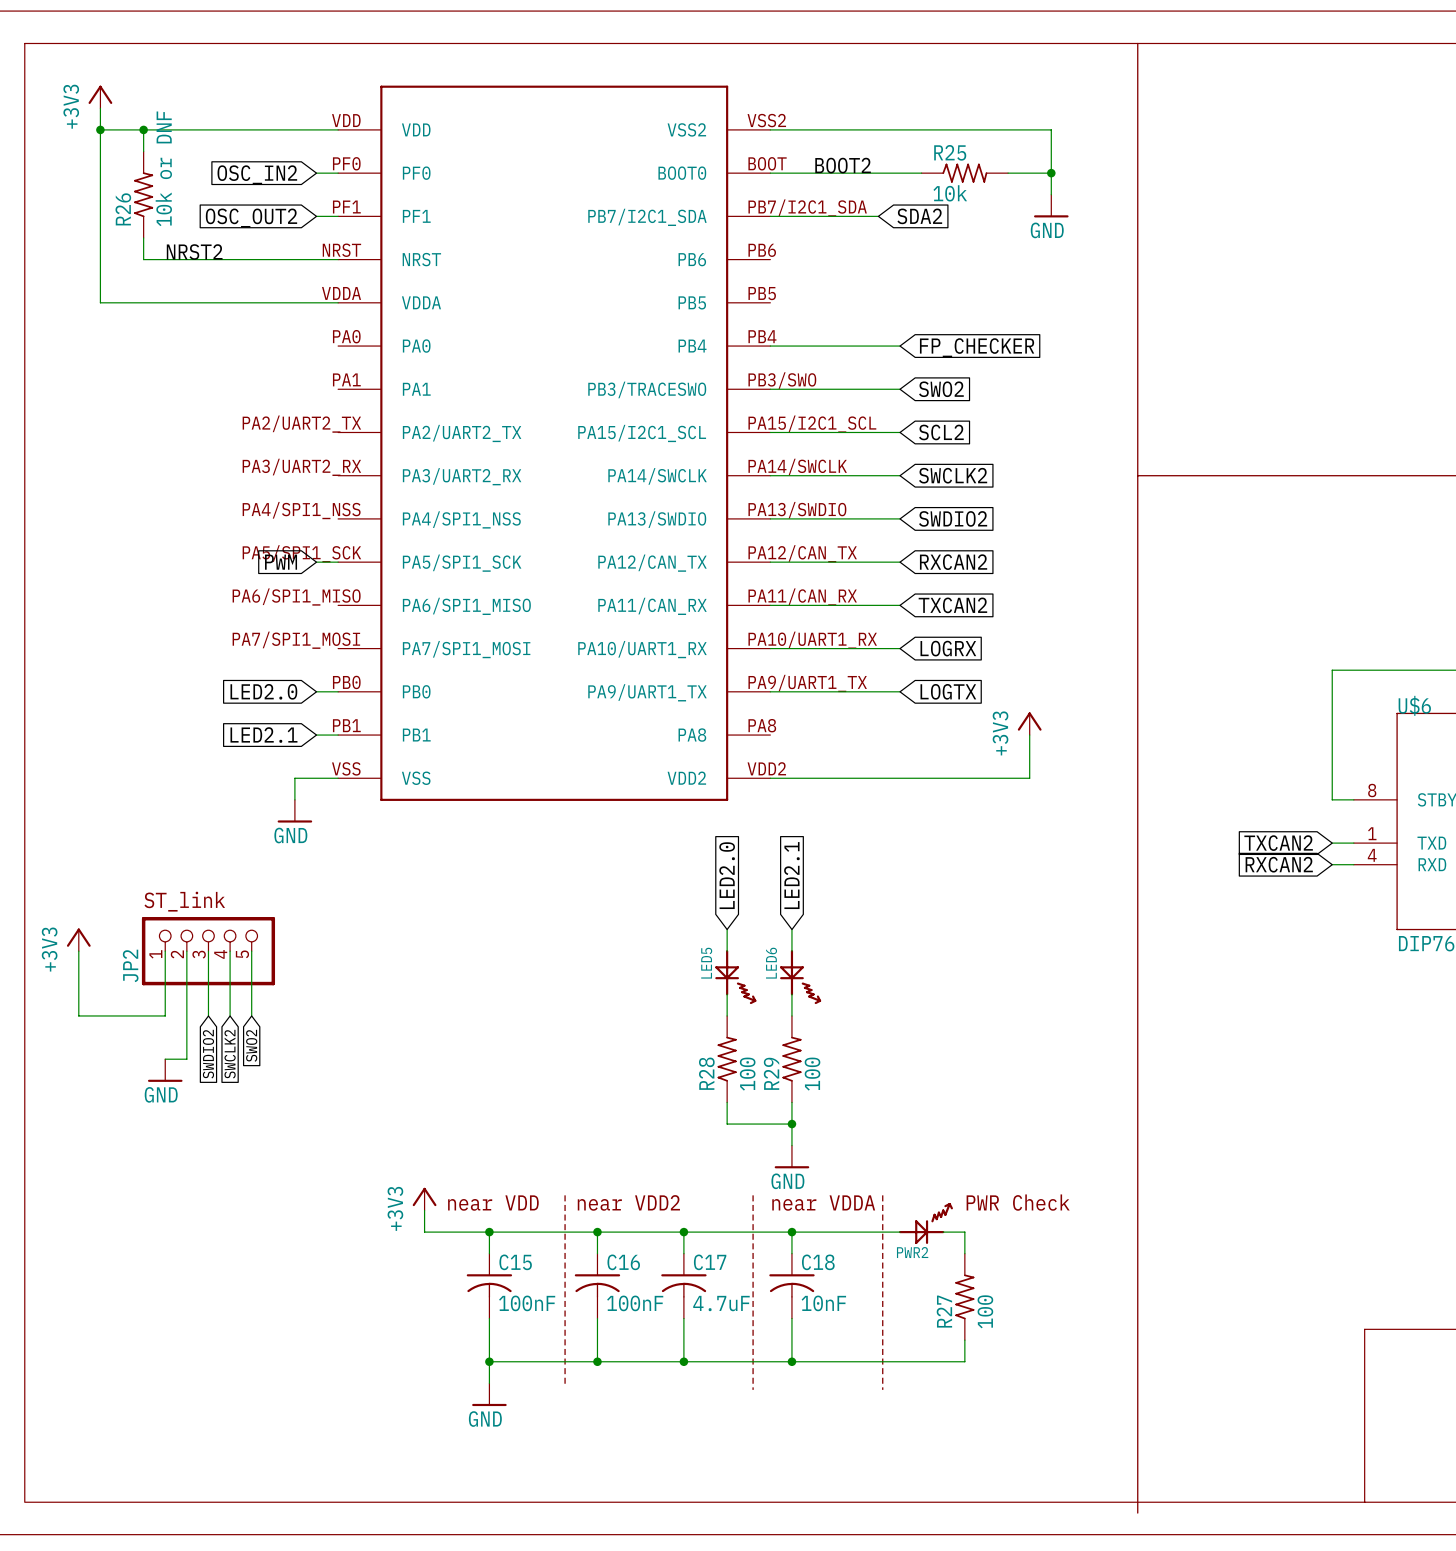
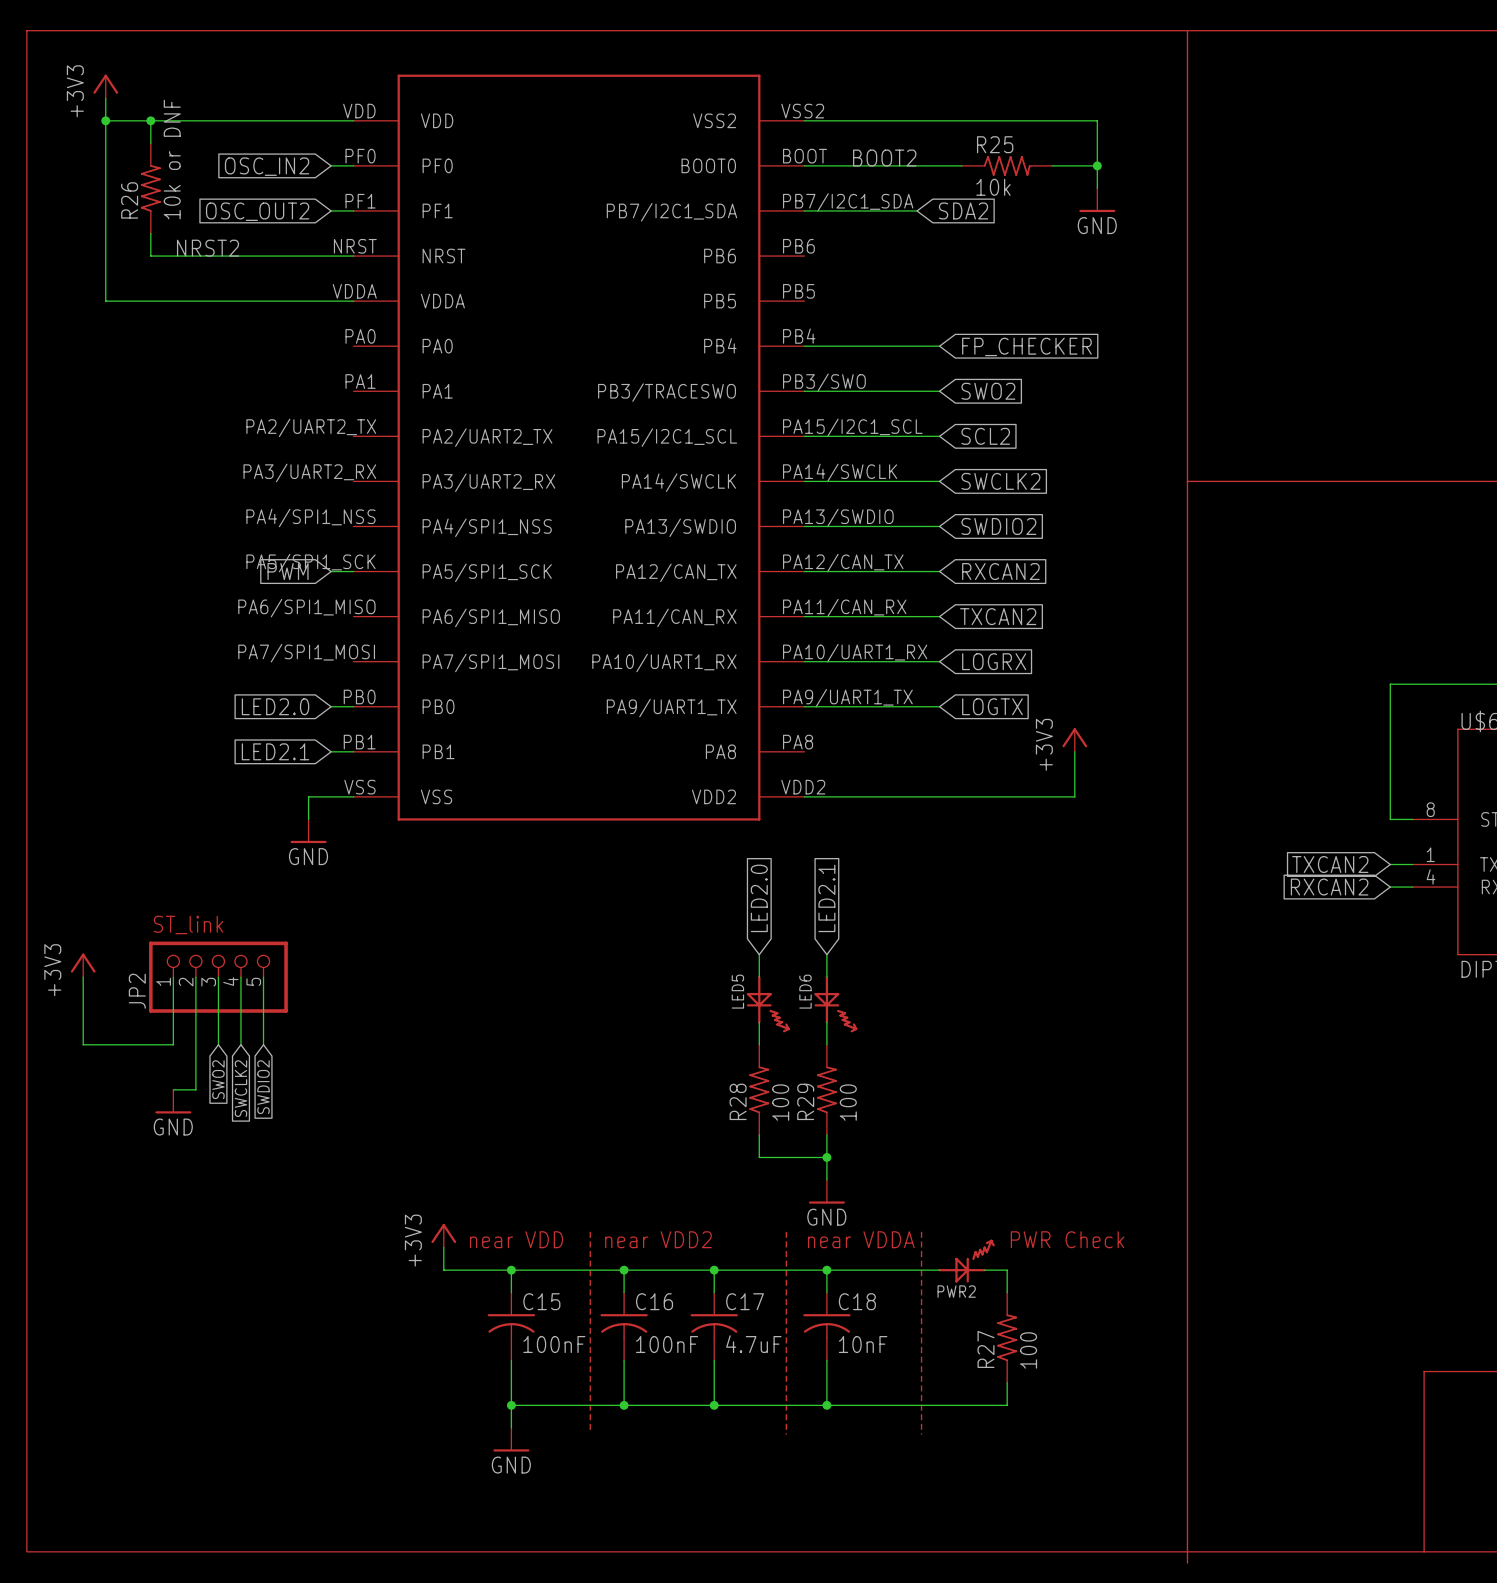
global label: SWO2 (251, 1045) -> SWDIO2 (263, 1087)
global label: SWDIO2 (208, 1054) -> SWO2 (218, 1079)

